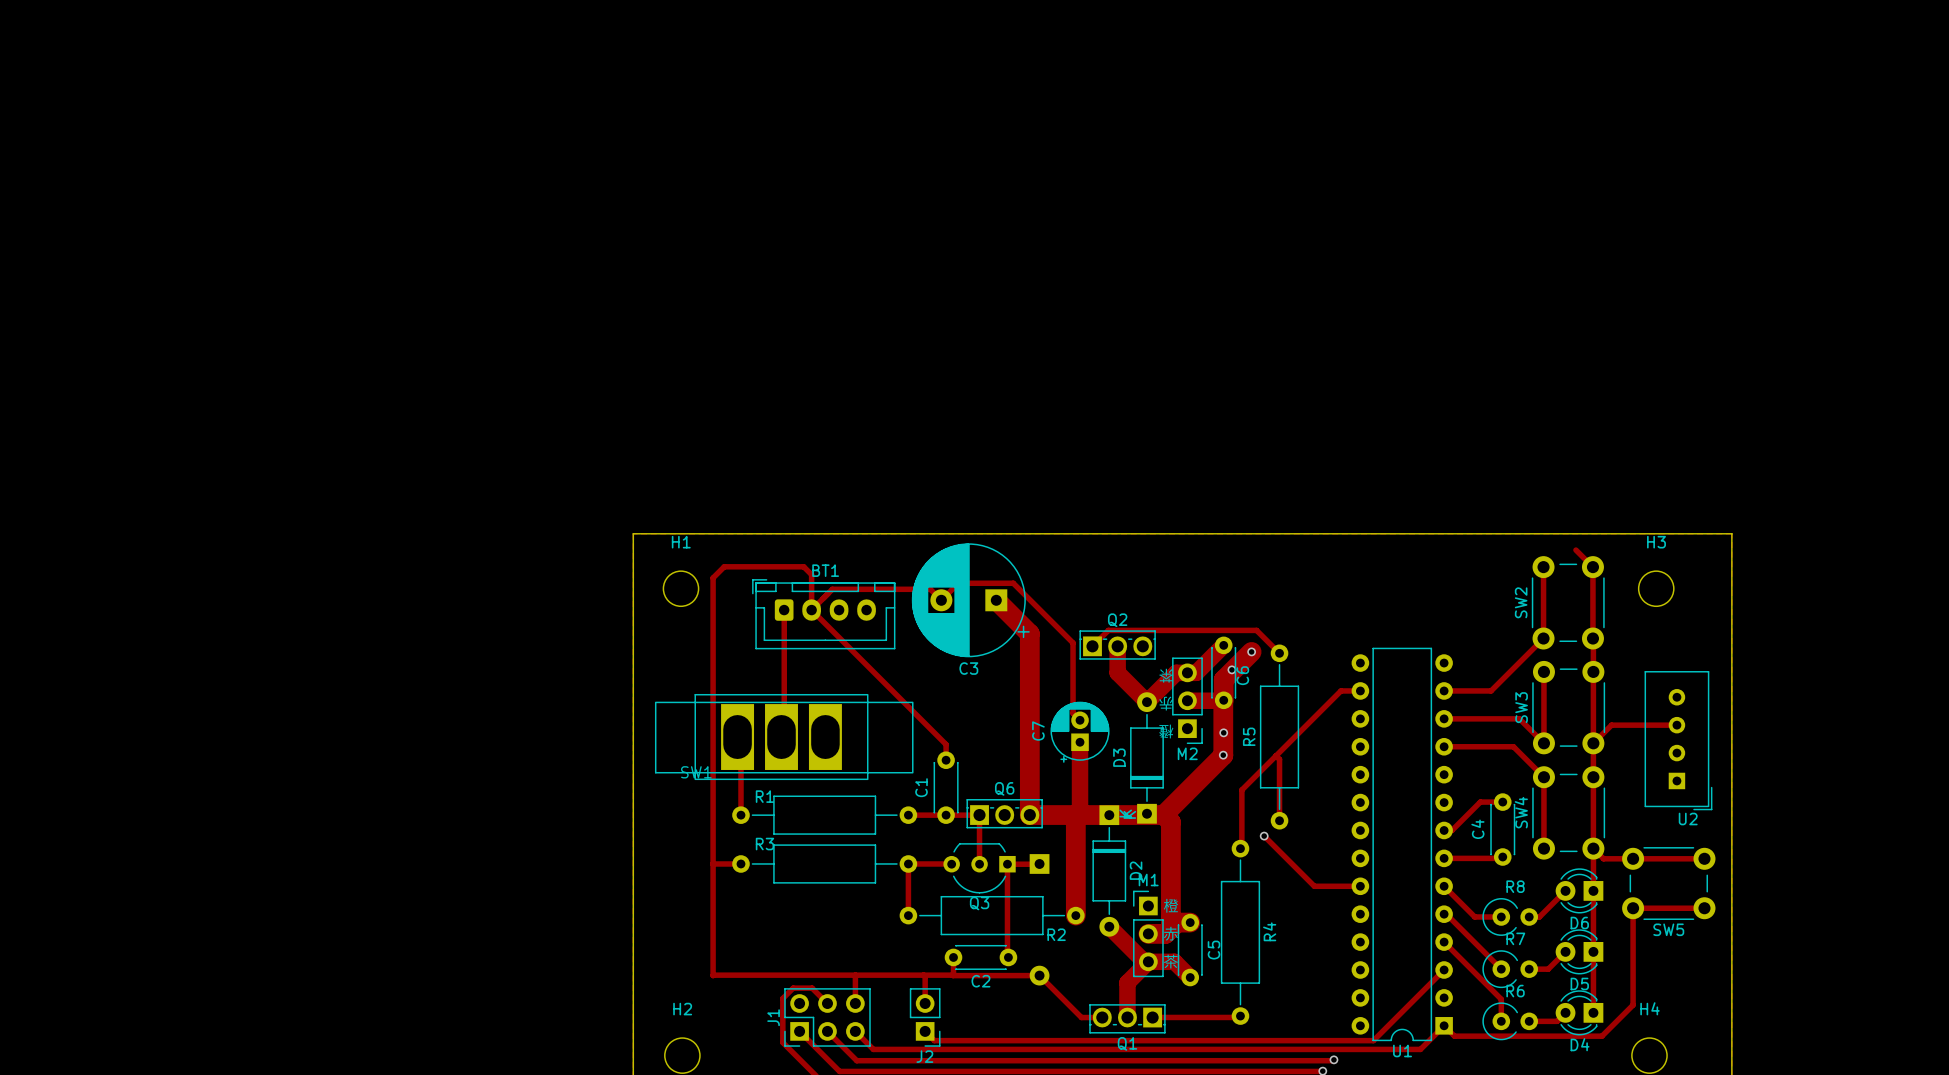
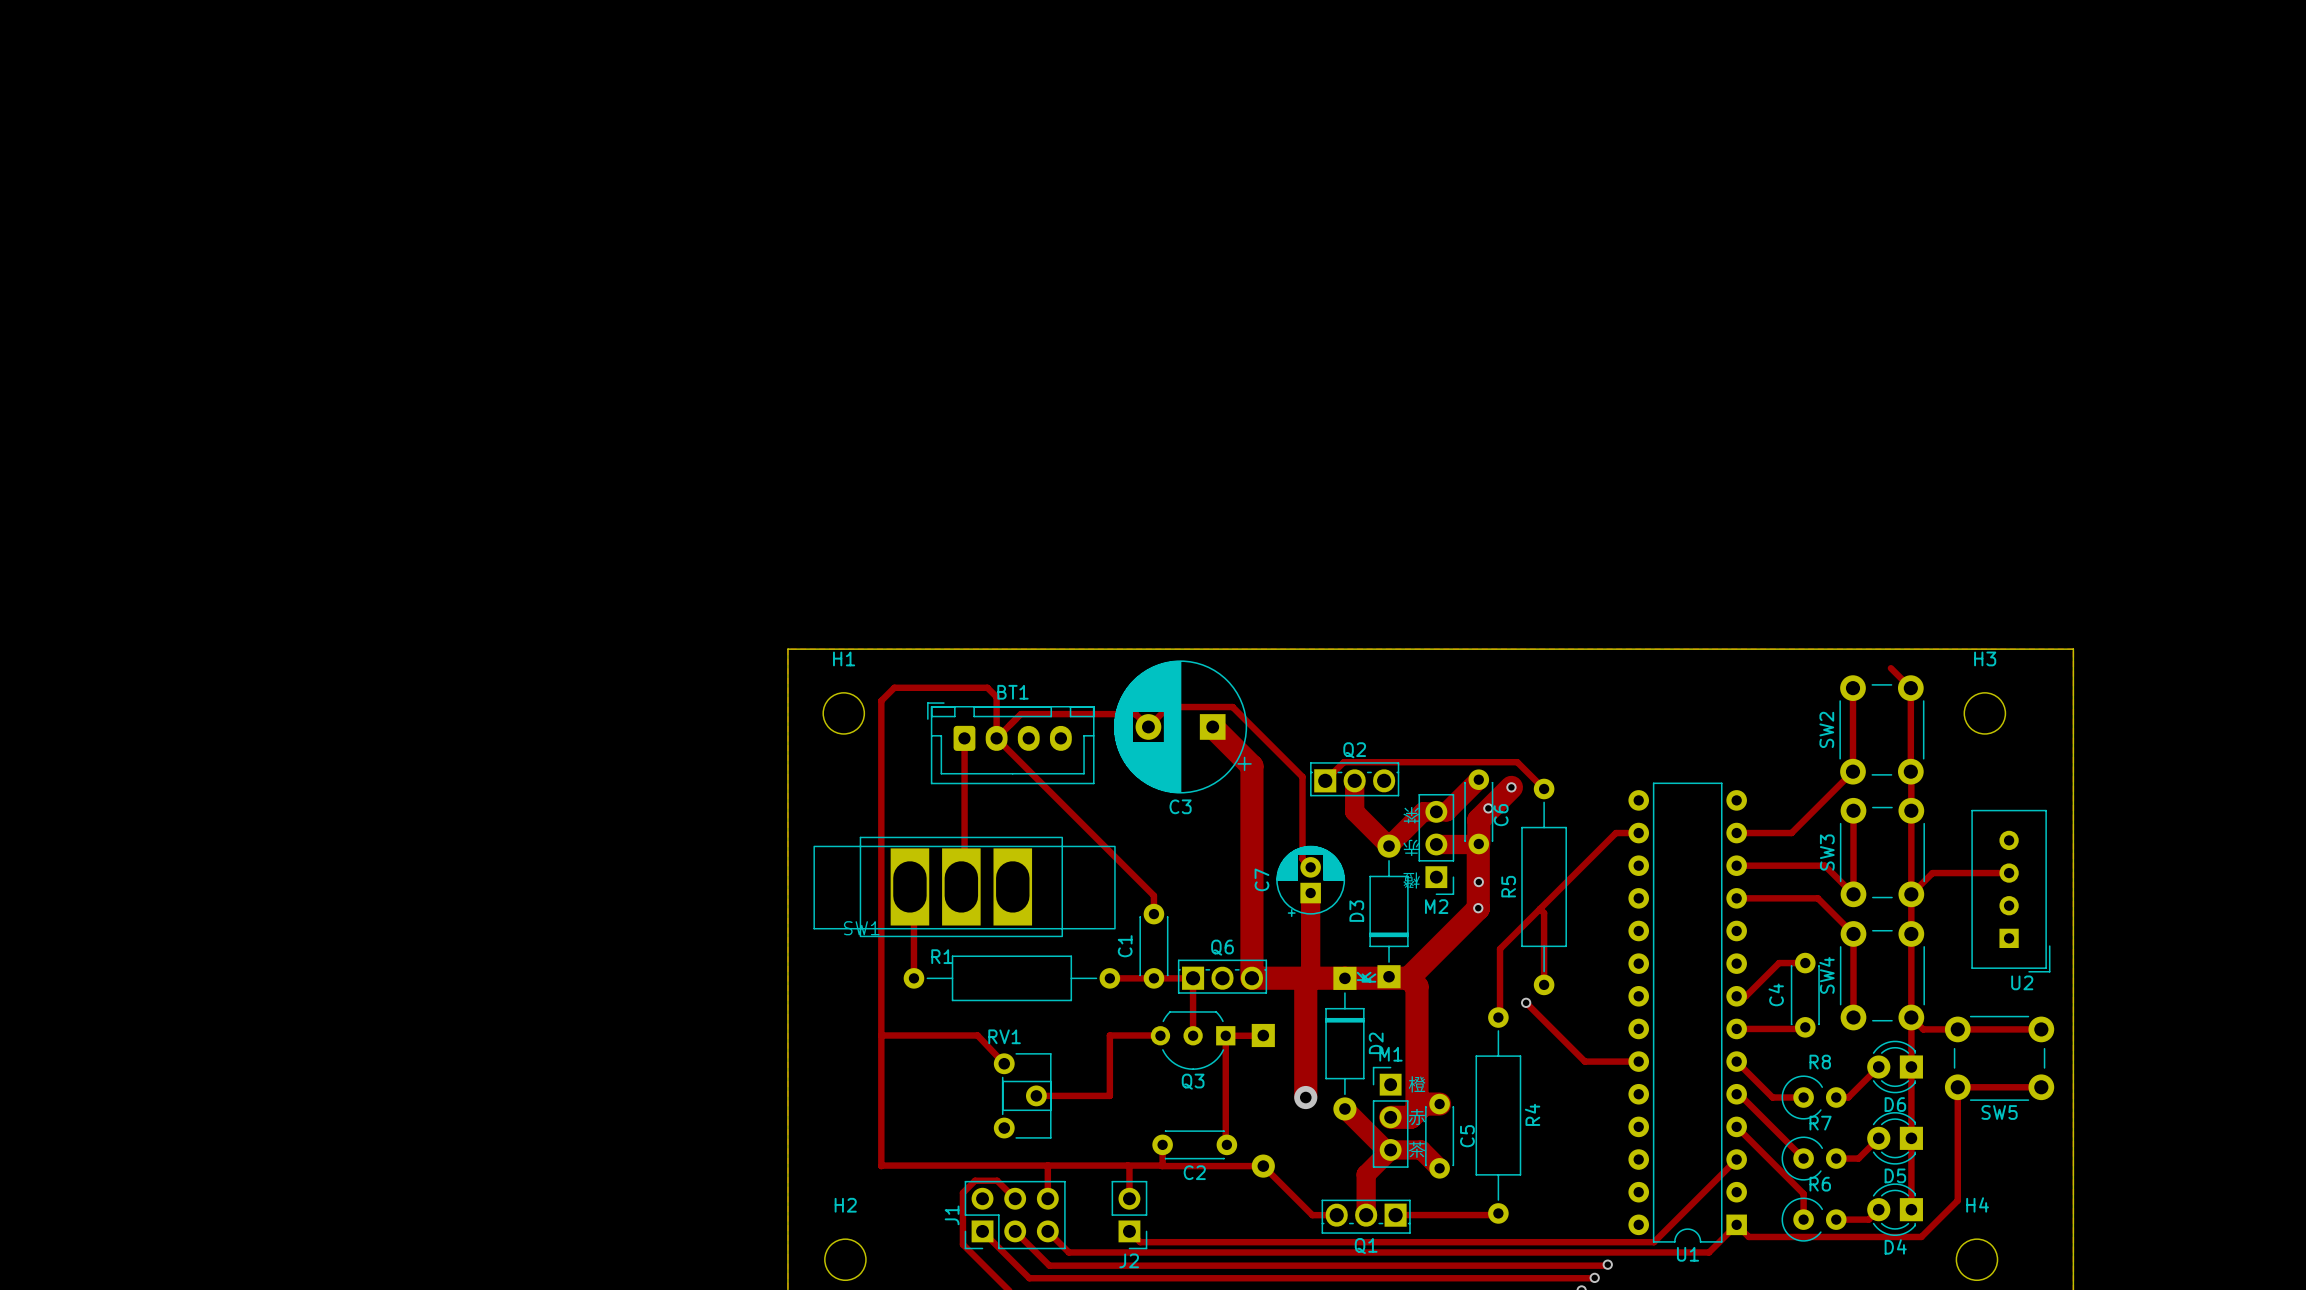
track: none -> (913, 1035) (977, 1035) (1004, 1063)
R3: (824, 863) -> none
RV1: none -> (1022, 1095)
track: none -> (1036, 1095) (1109, 1095)
R2: (992, 915) -> none
via: none -> (1305, 1097)

